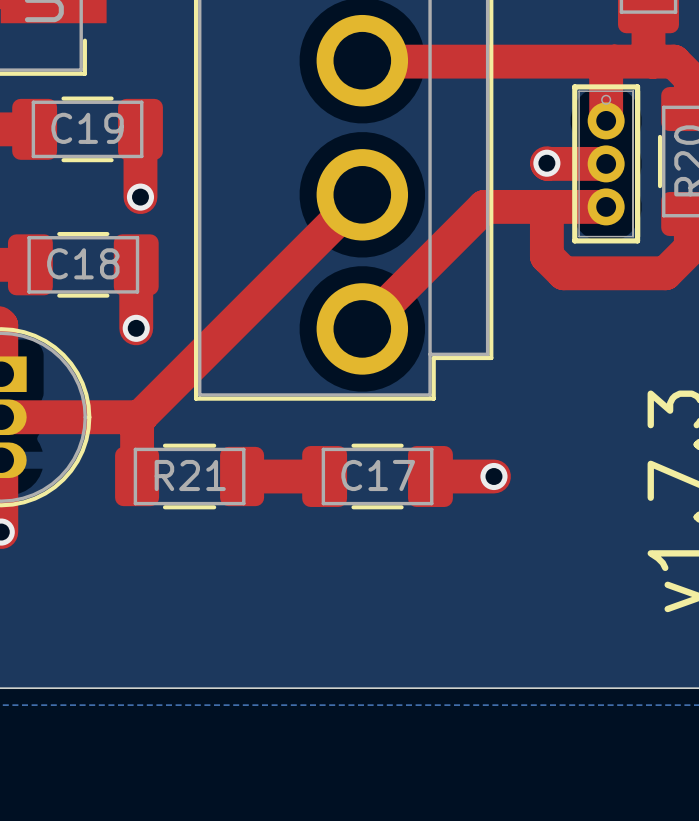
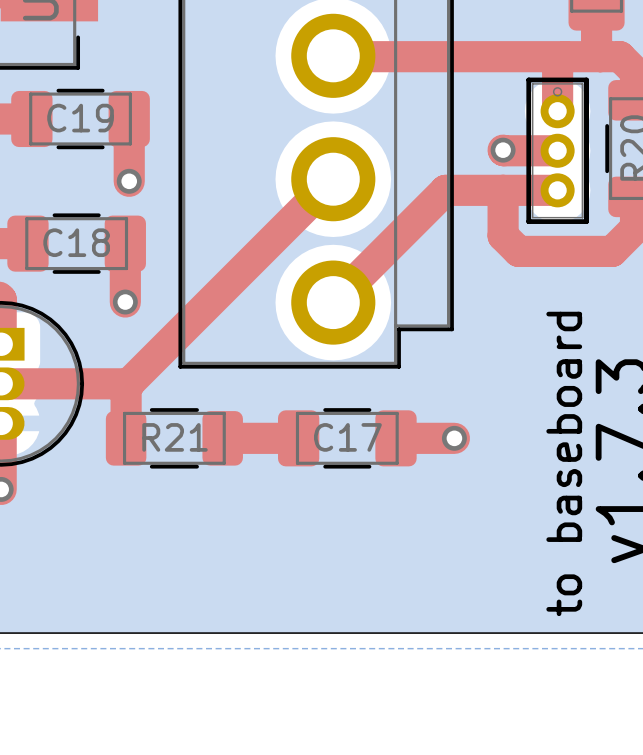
part value: none -> to baseboard (564, 463)

